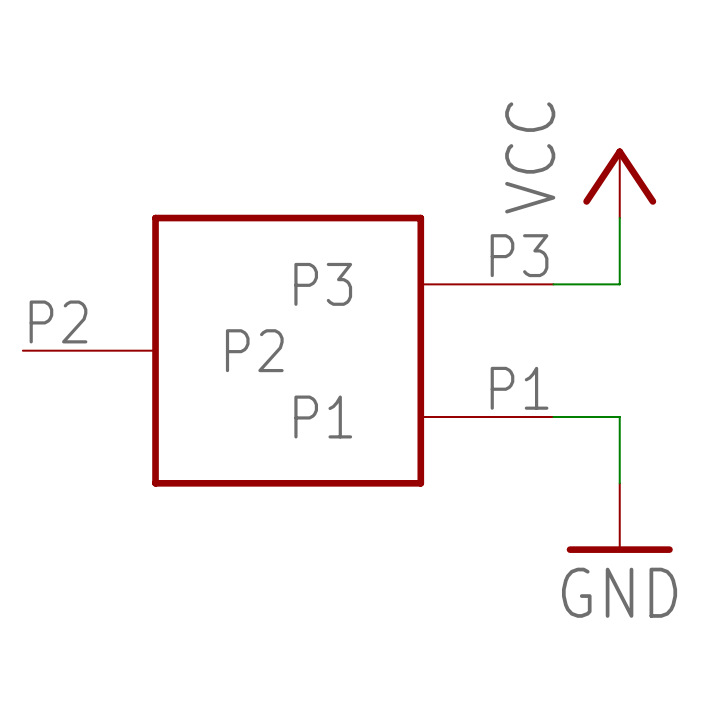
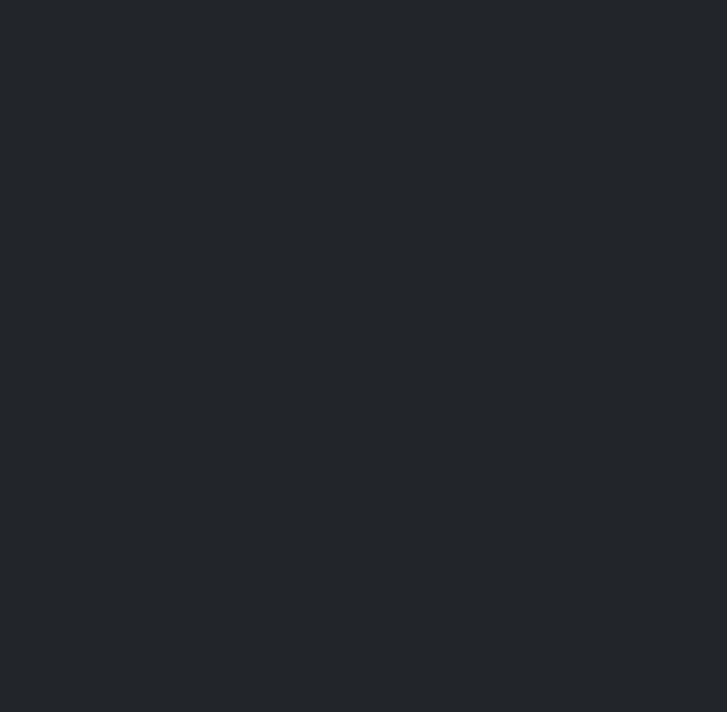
power symbol: VCC (619, 183) -> none
wire: (619, 218) (619, 284) (553, 284) -> none
part: (288, 350) -> none
wire: (553, 417) (619, 417) (619, 483) -> none
power symbol: GND (619, 518) -> none

